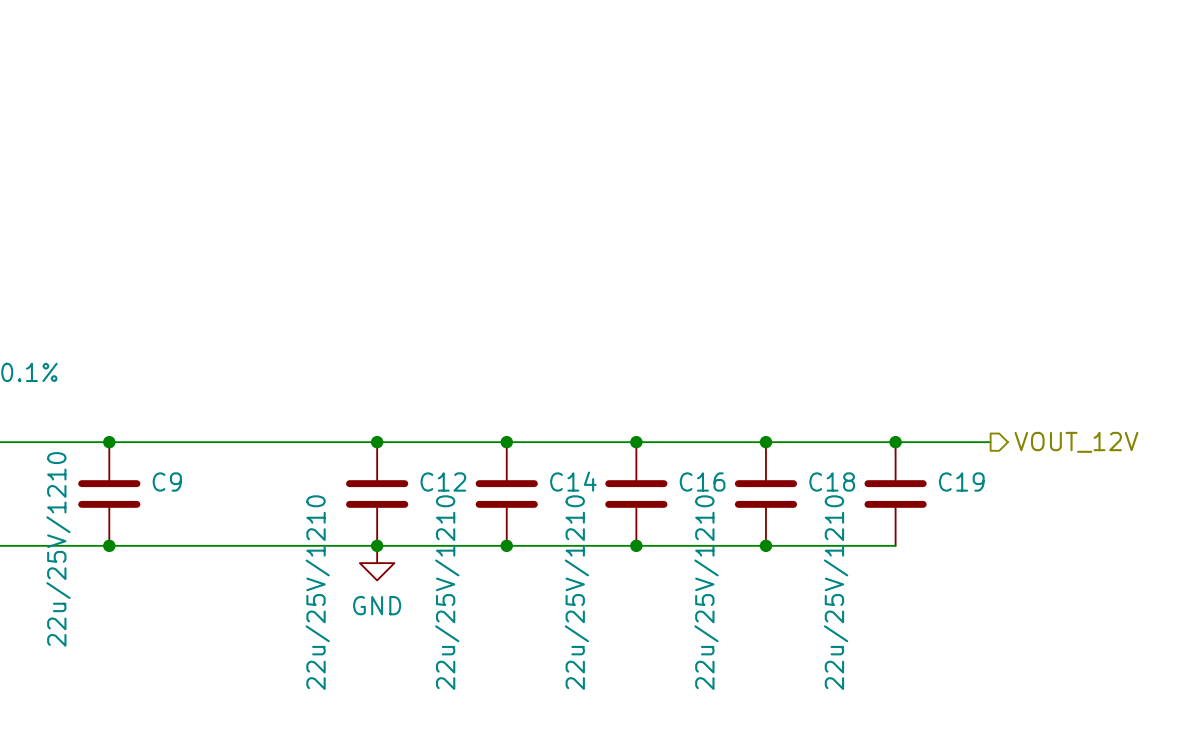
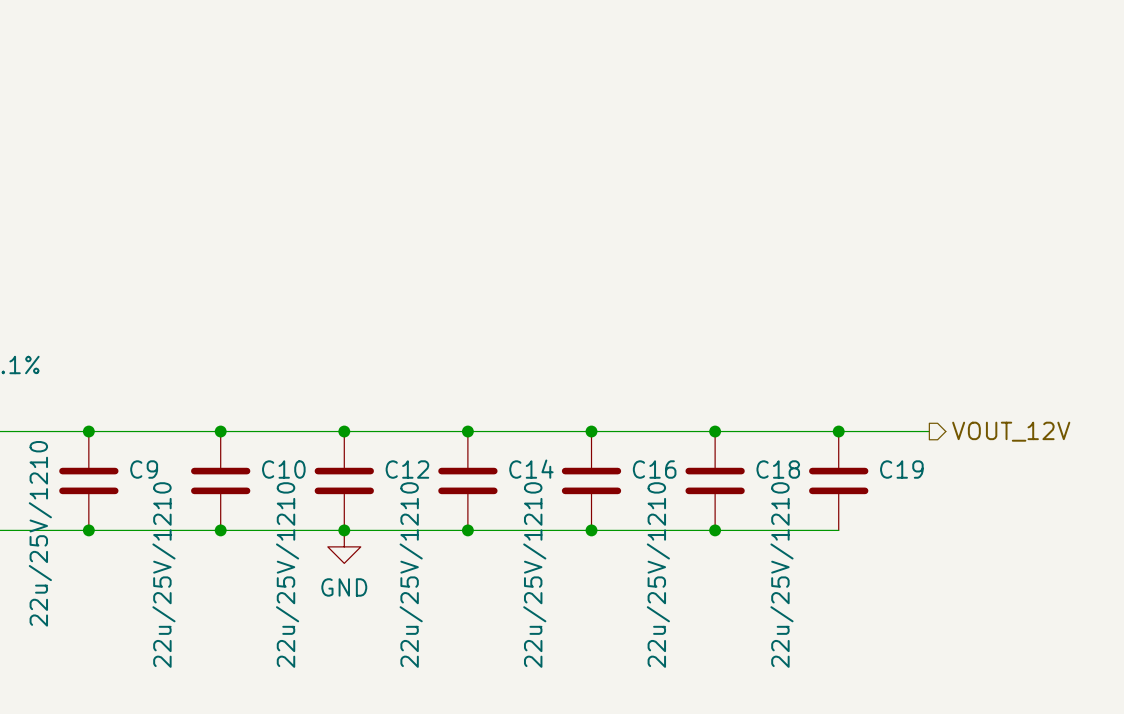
junction: none -> (220, 431)
C10: none -> 22u/25V/1210 (220, 480)
junction: none -> (220, 530)

